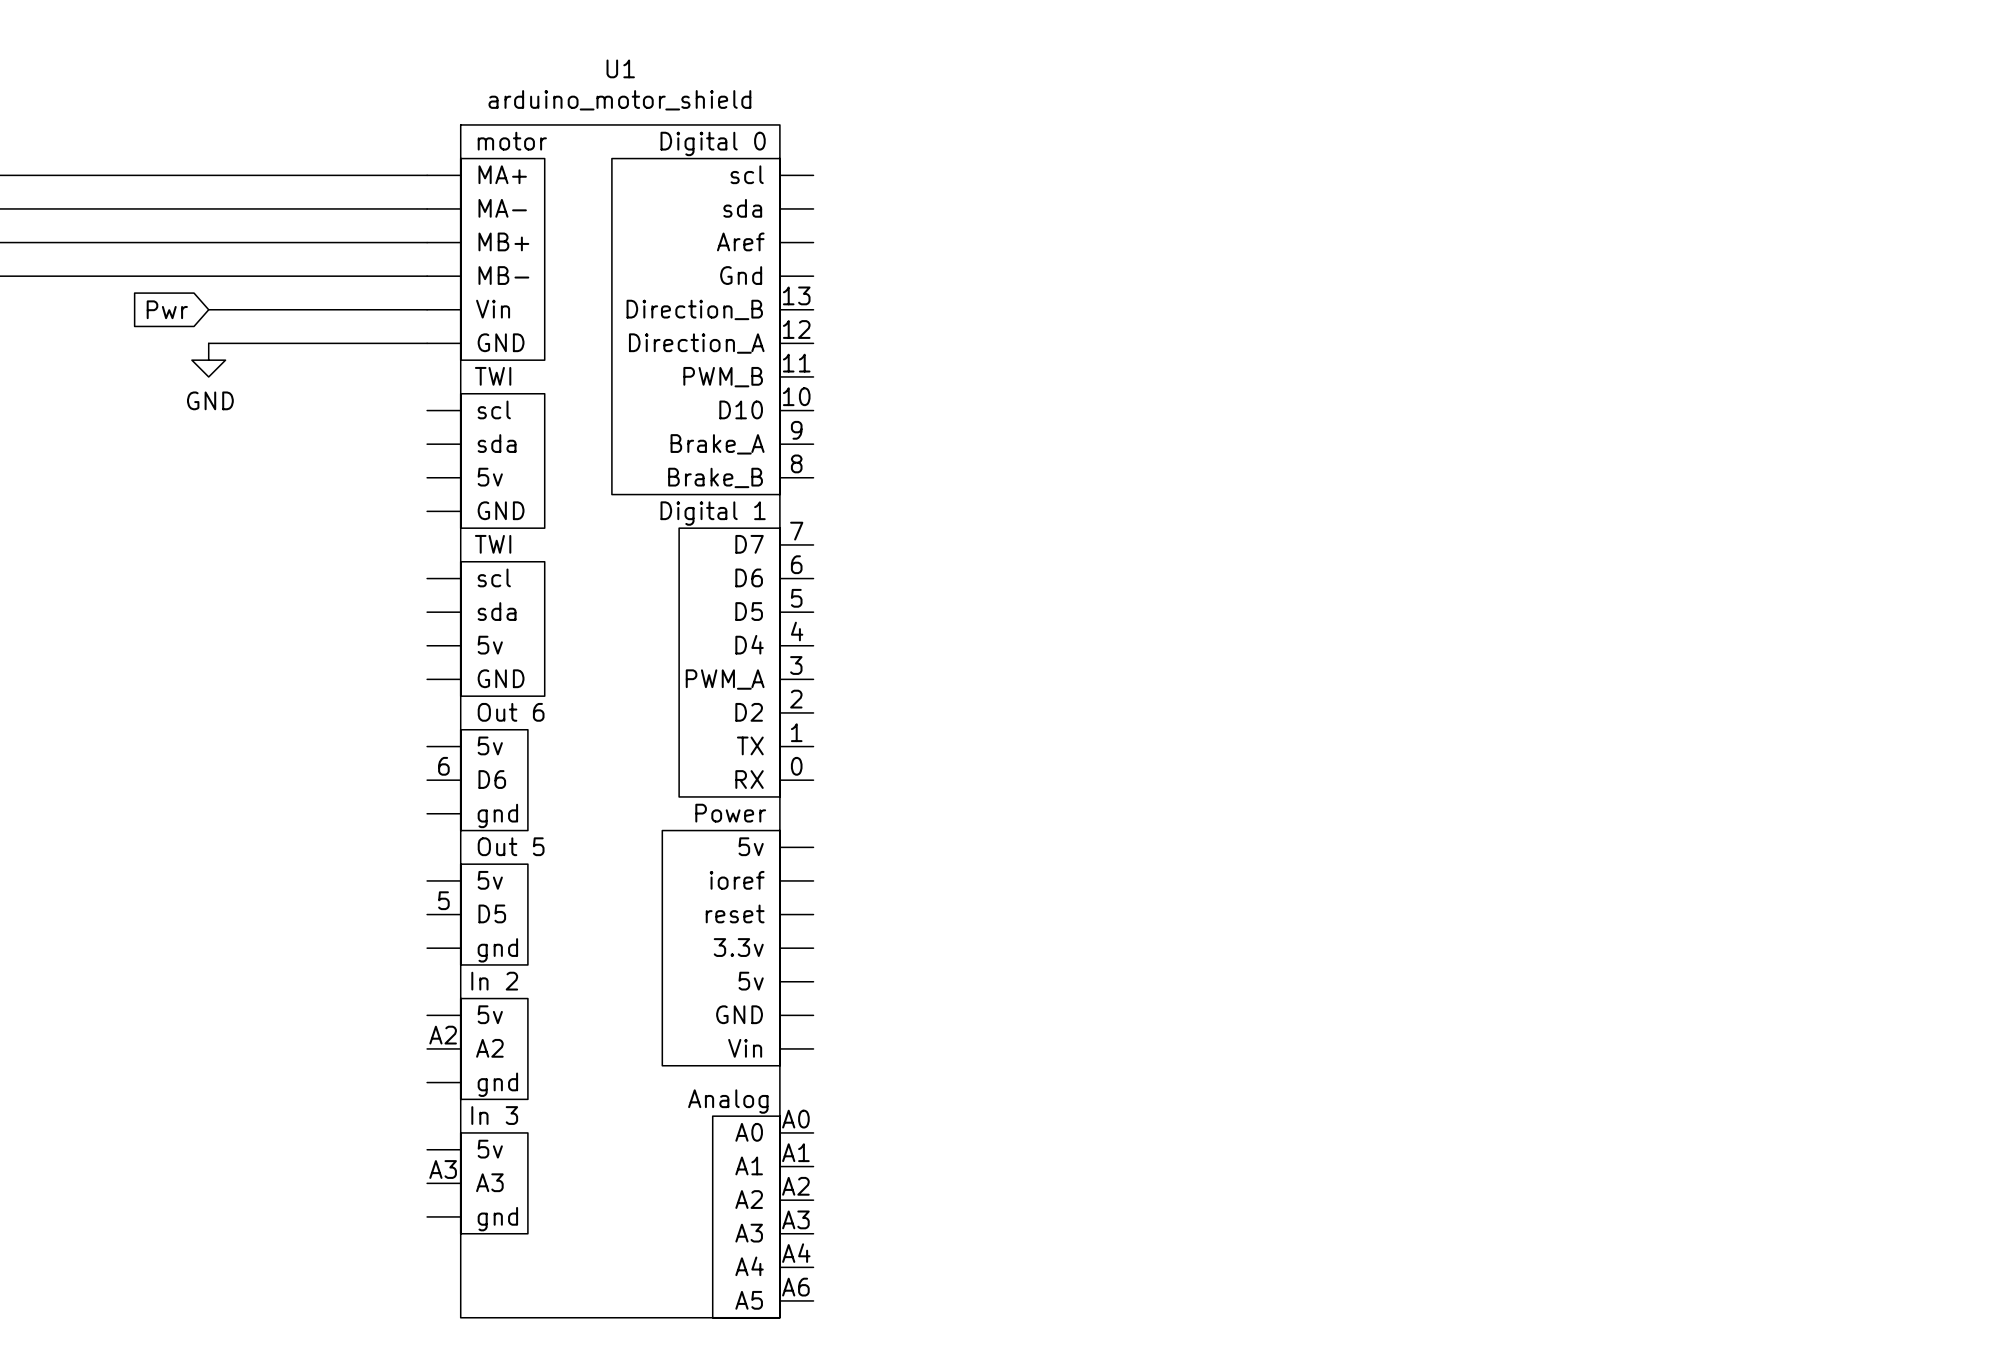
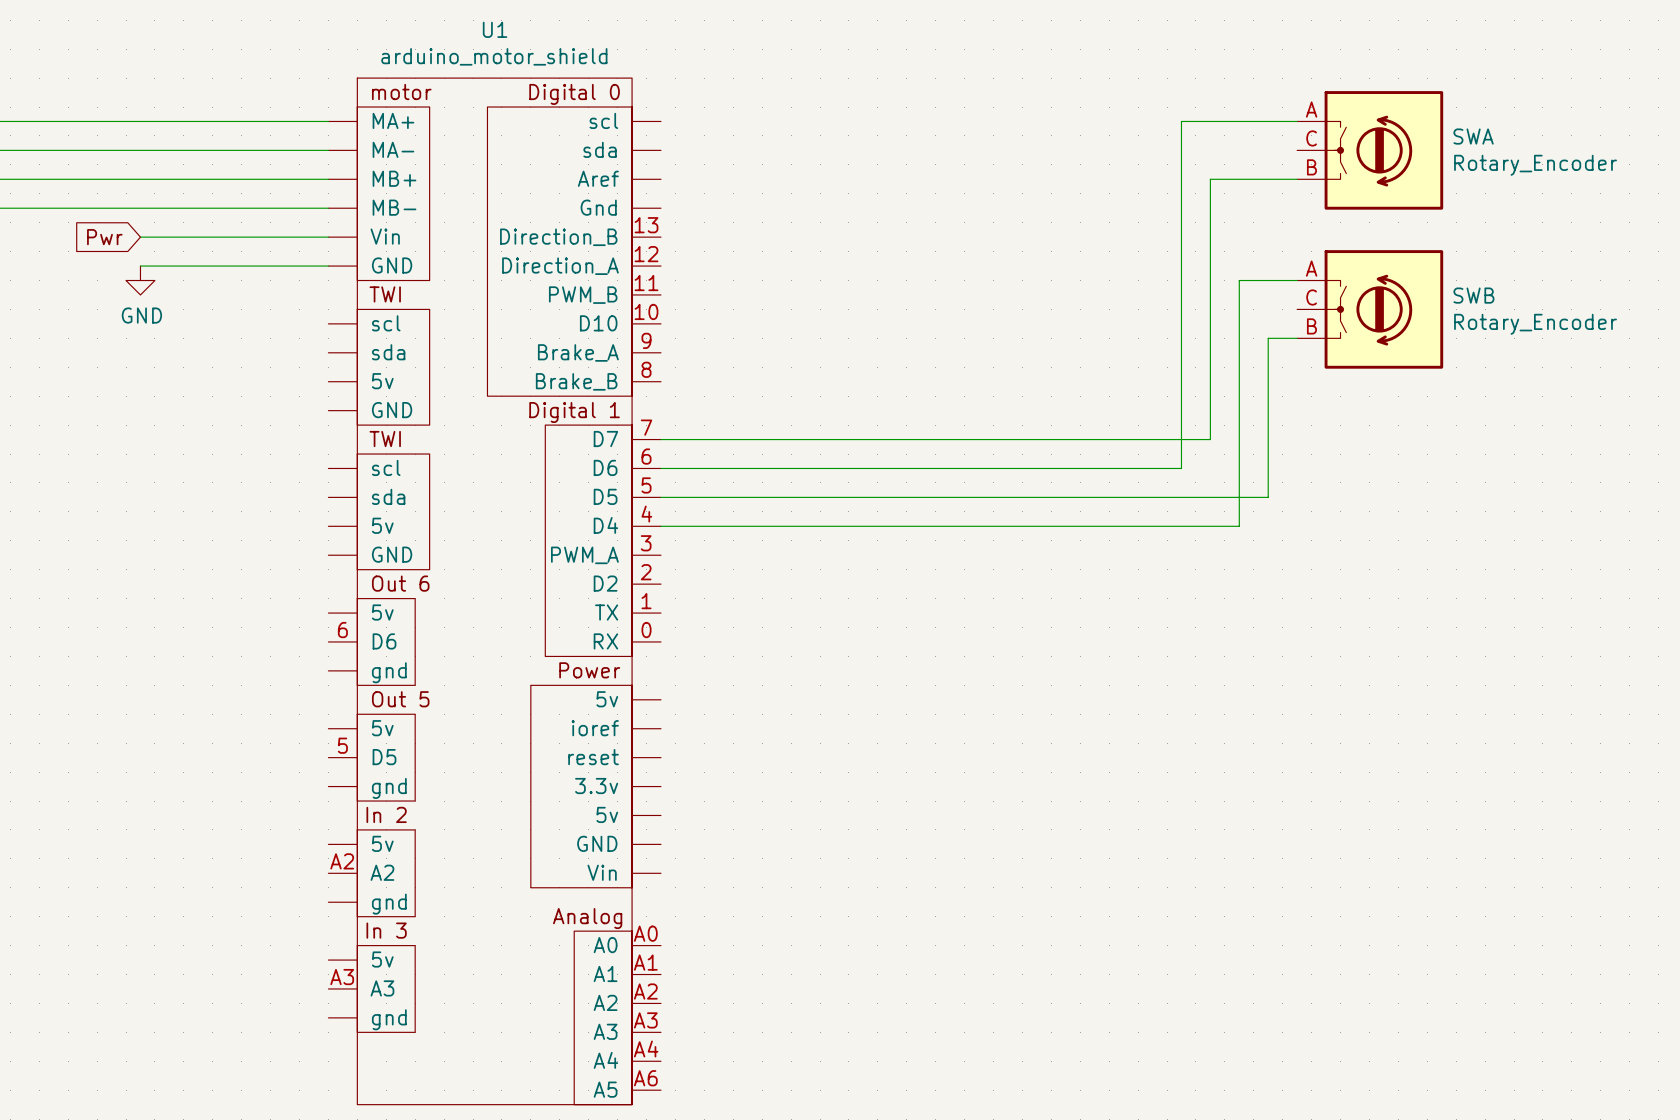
wire: none -> (1297, 121) (1181, 121) (1181, 468) (660, 468)
SWA: none -> Rotary_Encoder (1370, 150)
wire: none -> (1297, 179) (1210, 179) (1210, 439) (660, 439)
wire: none -> (1297, 280) (1239, 280) (1239, 526) (660, 526)
SWB: none -> Rotary_Encoder (1370, 309)
wire: none -> (1297, 338) (1268, 338) (1268, 497) (660, 497)

